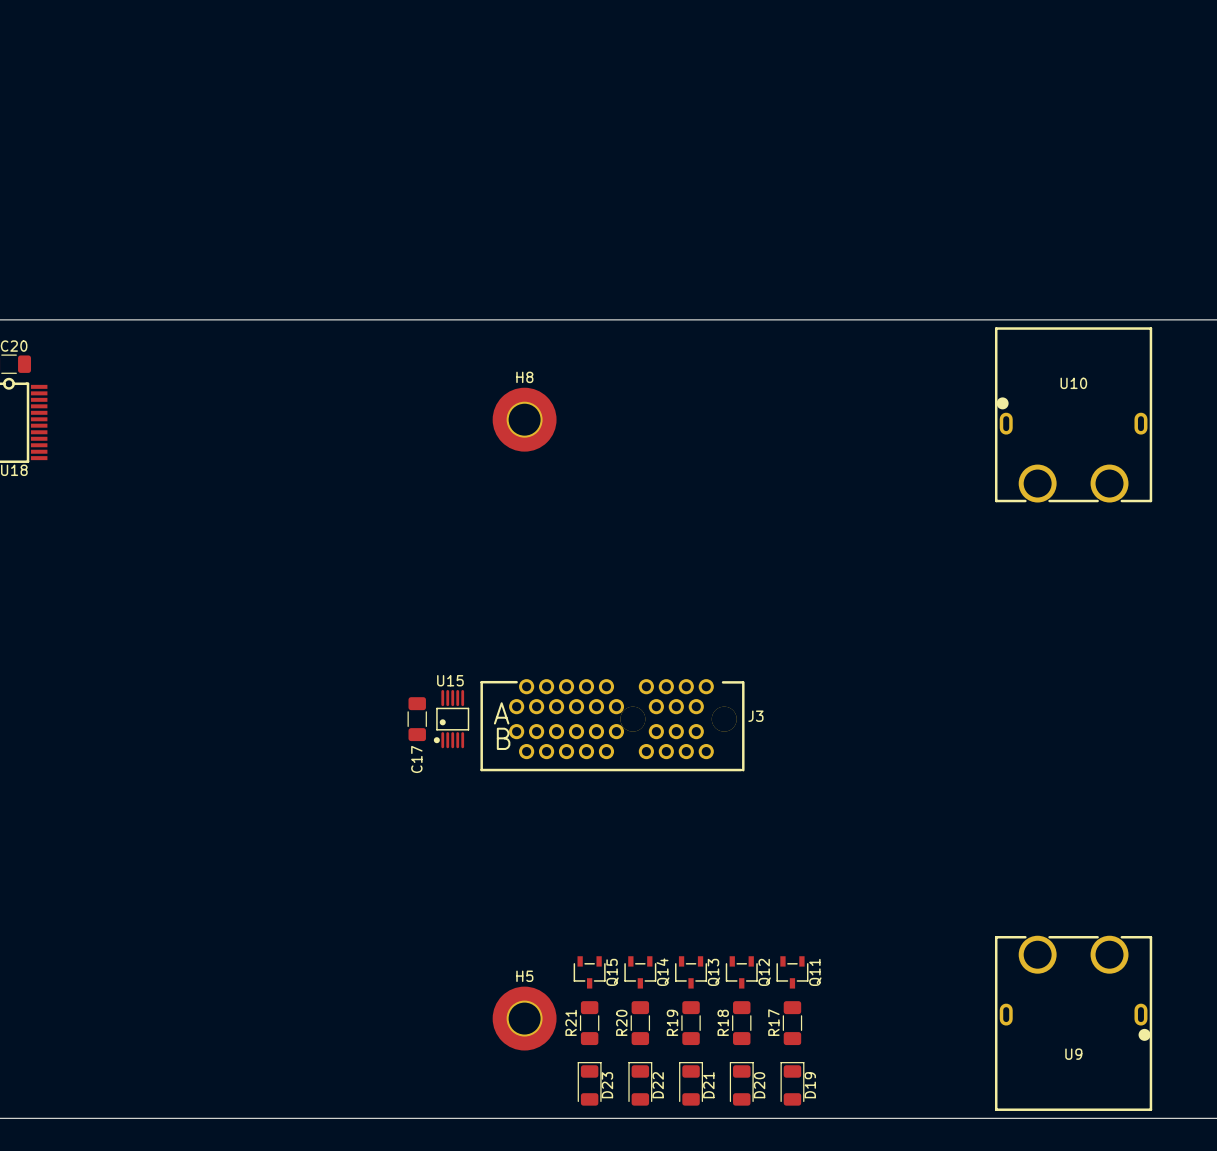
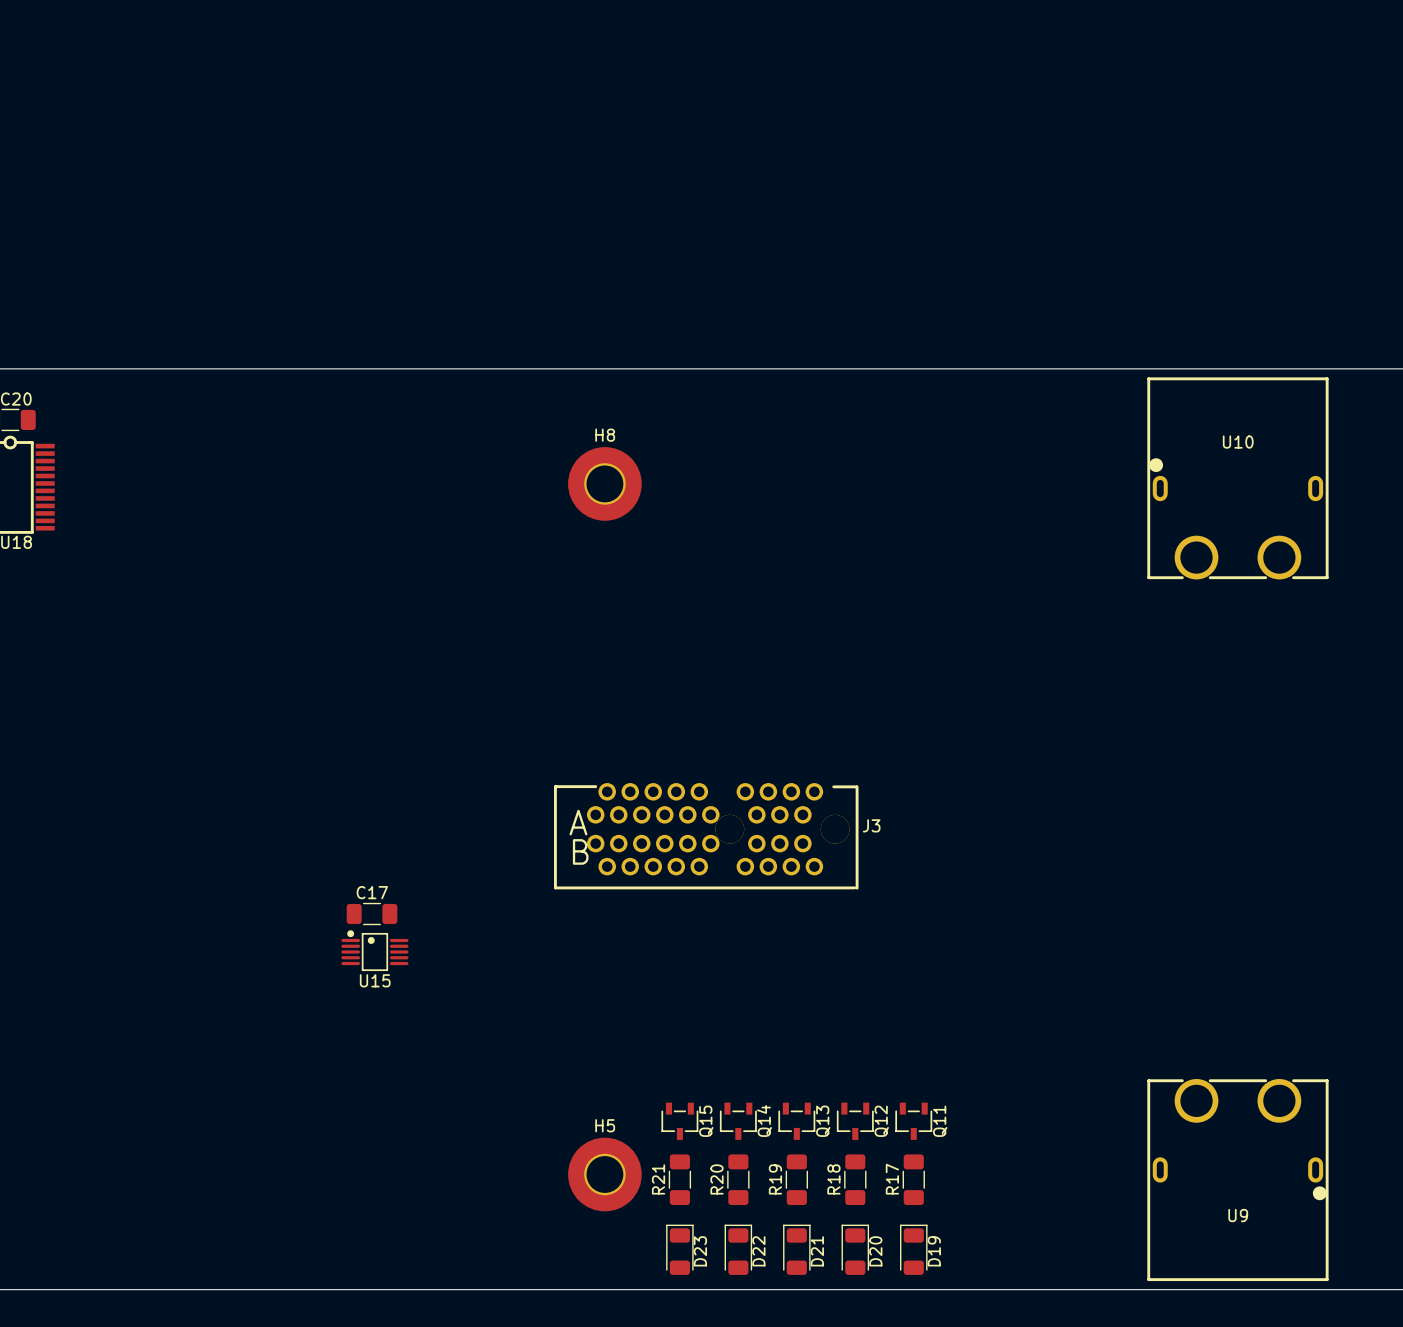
U15 name position: U15 (450, 680) -> U15 (375, 980)
C17 rotation: 0° (417, 719) -> 90° clockwise (372, 914)
C17 position: (417, 719) -> (372, 914)
U15 rotation: 0° (451, 719) -> 90° clockwise (374, 950)
U15 position: (451, 719) -> (374, 950)
C17 name position: C17 (416, 759) -> C17 (372, 892)

